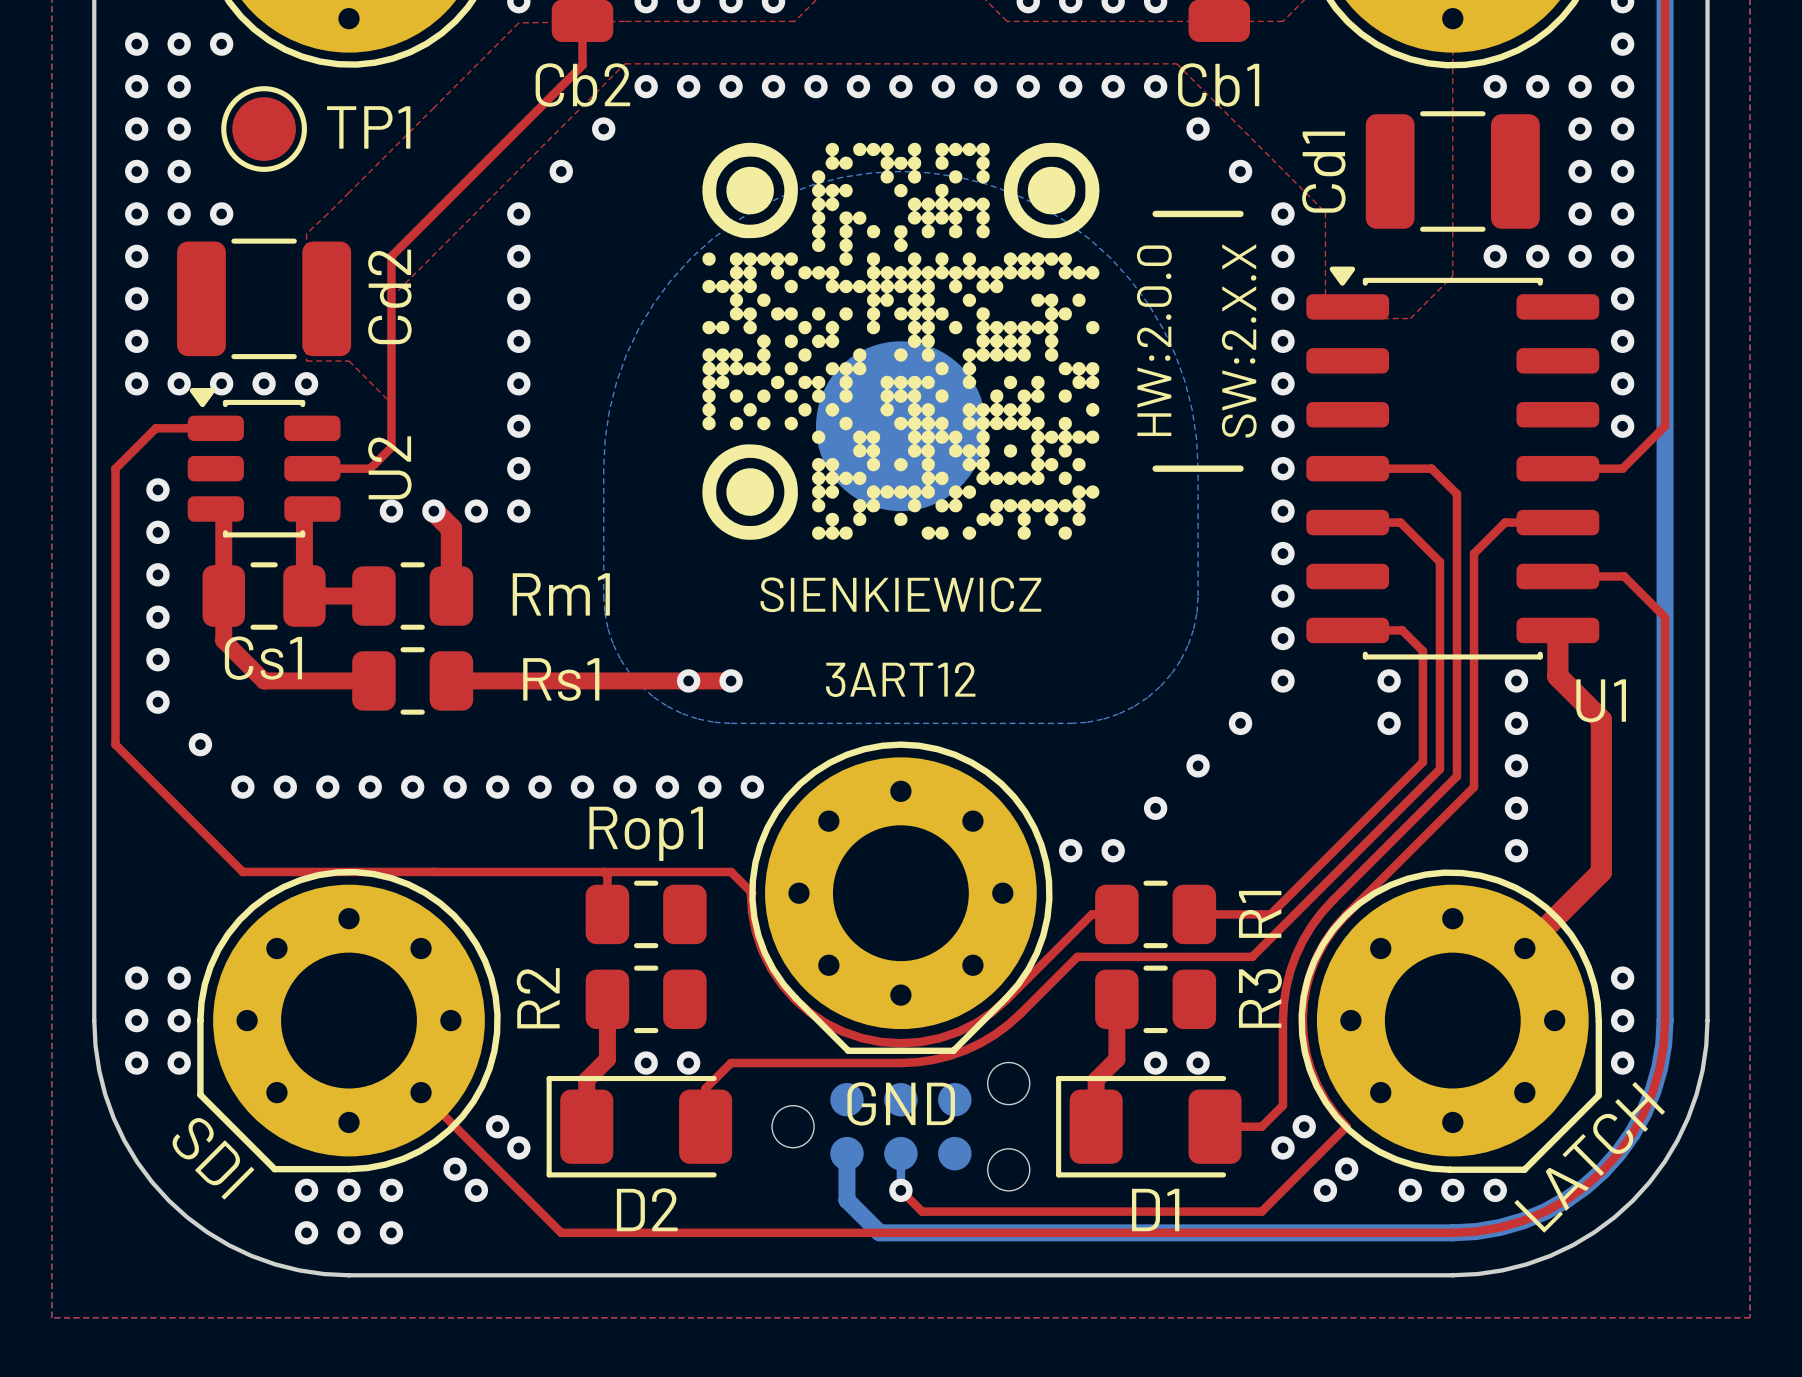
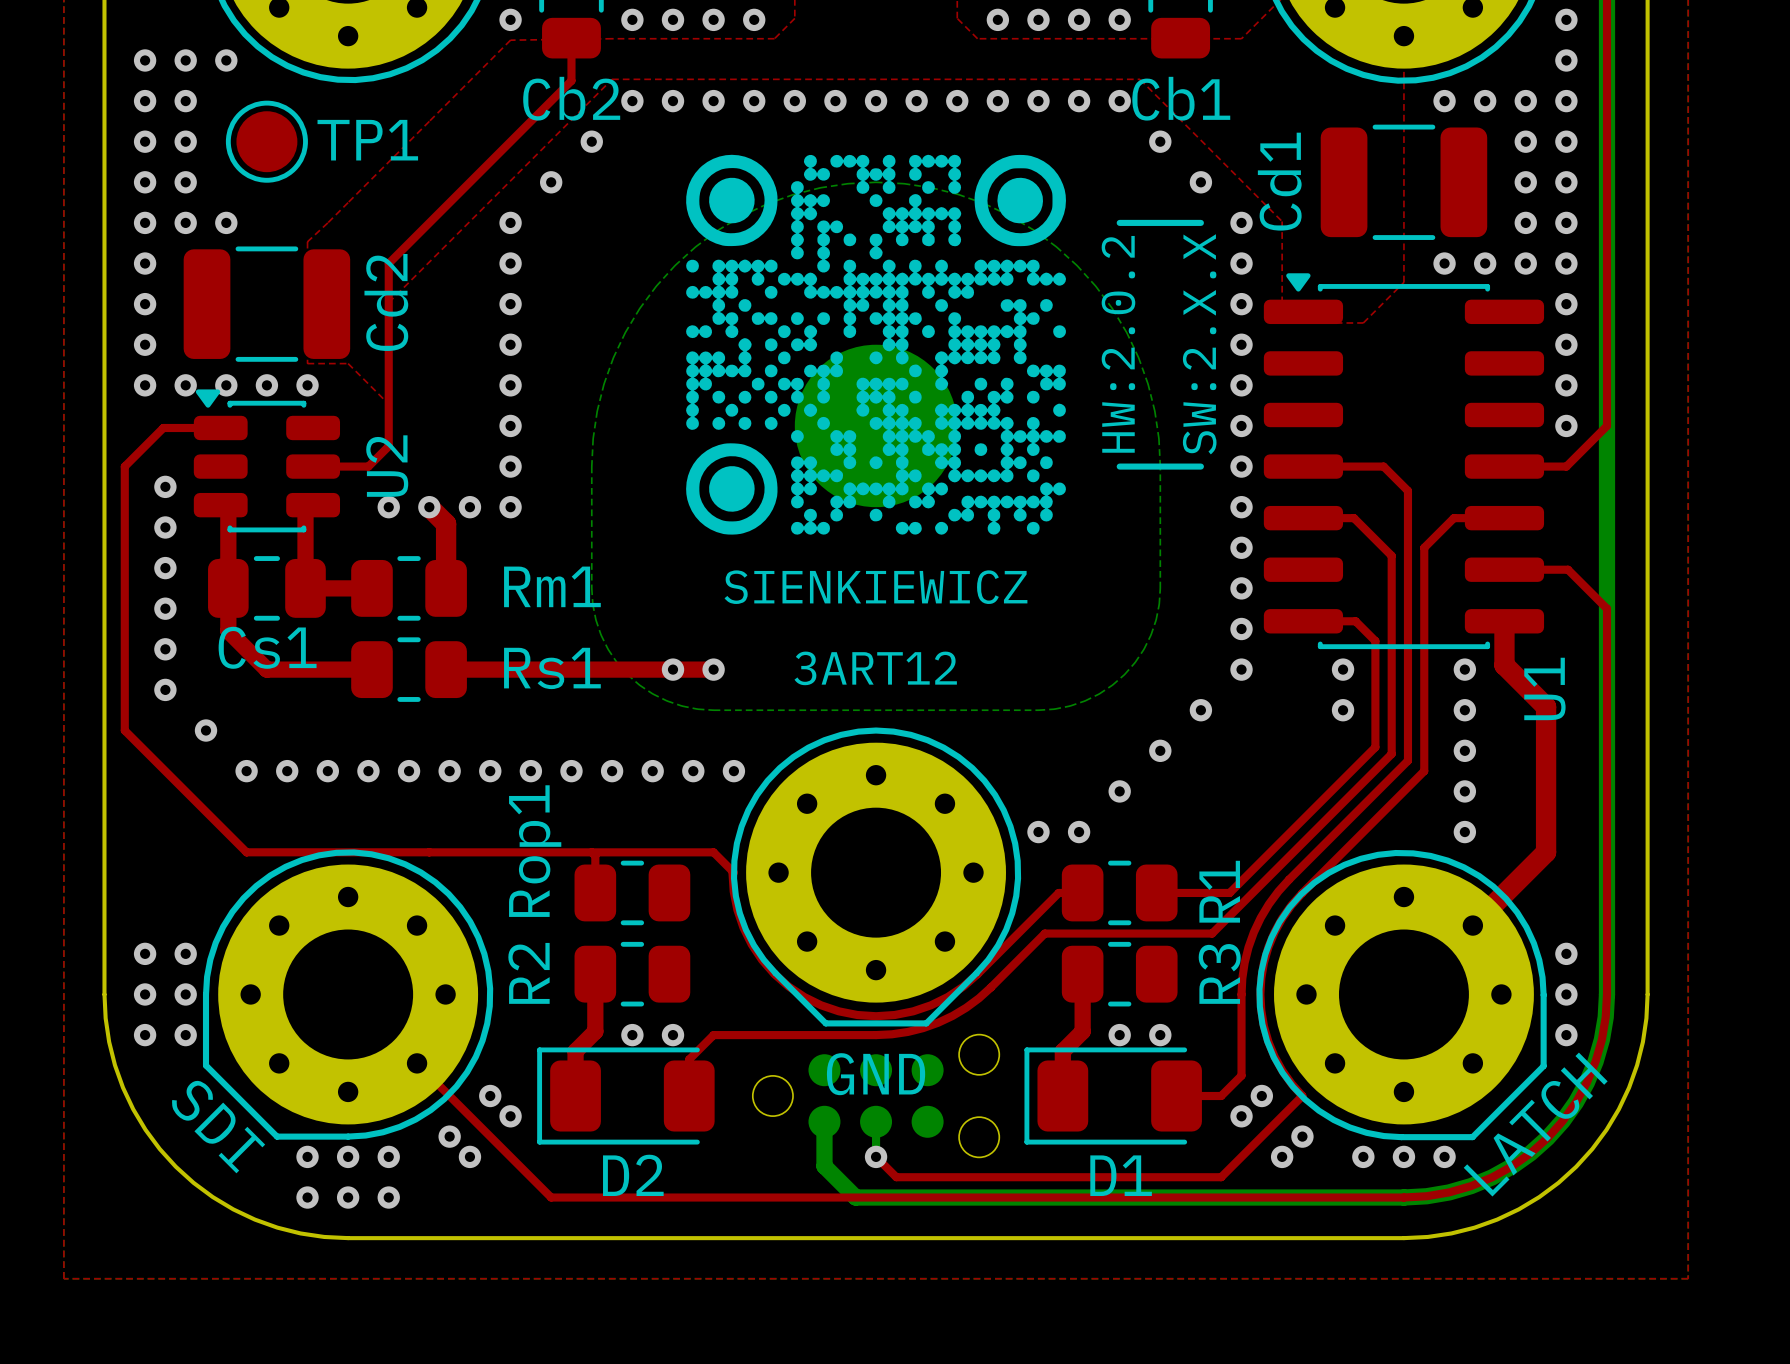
text: HW:2.0.0 (1154, 340) -> HW:2.0.2 (1118, 344)
U1 name rotation: 0° (1601, 700) -> 90° counterclockwise (1544, 688)
Rop1 name rotation: 0° (646, 833) -> 90° counterclockwise (535, 851)

